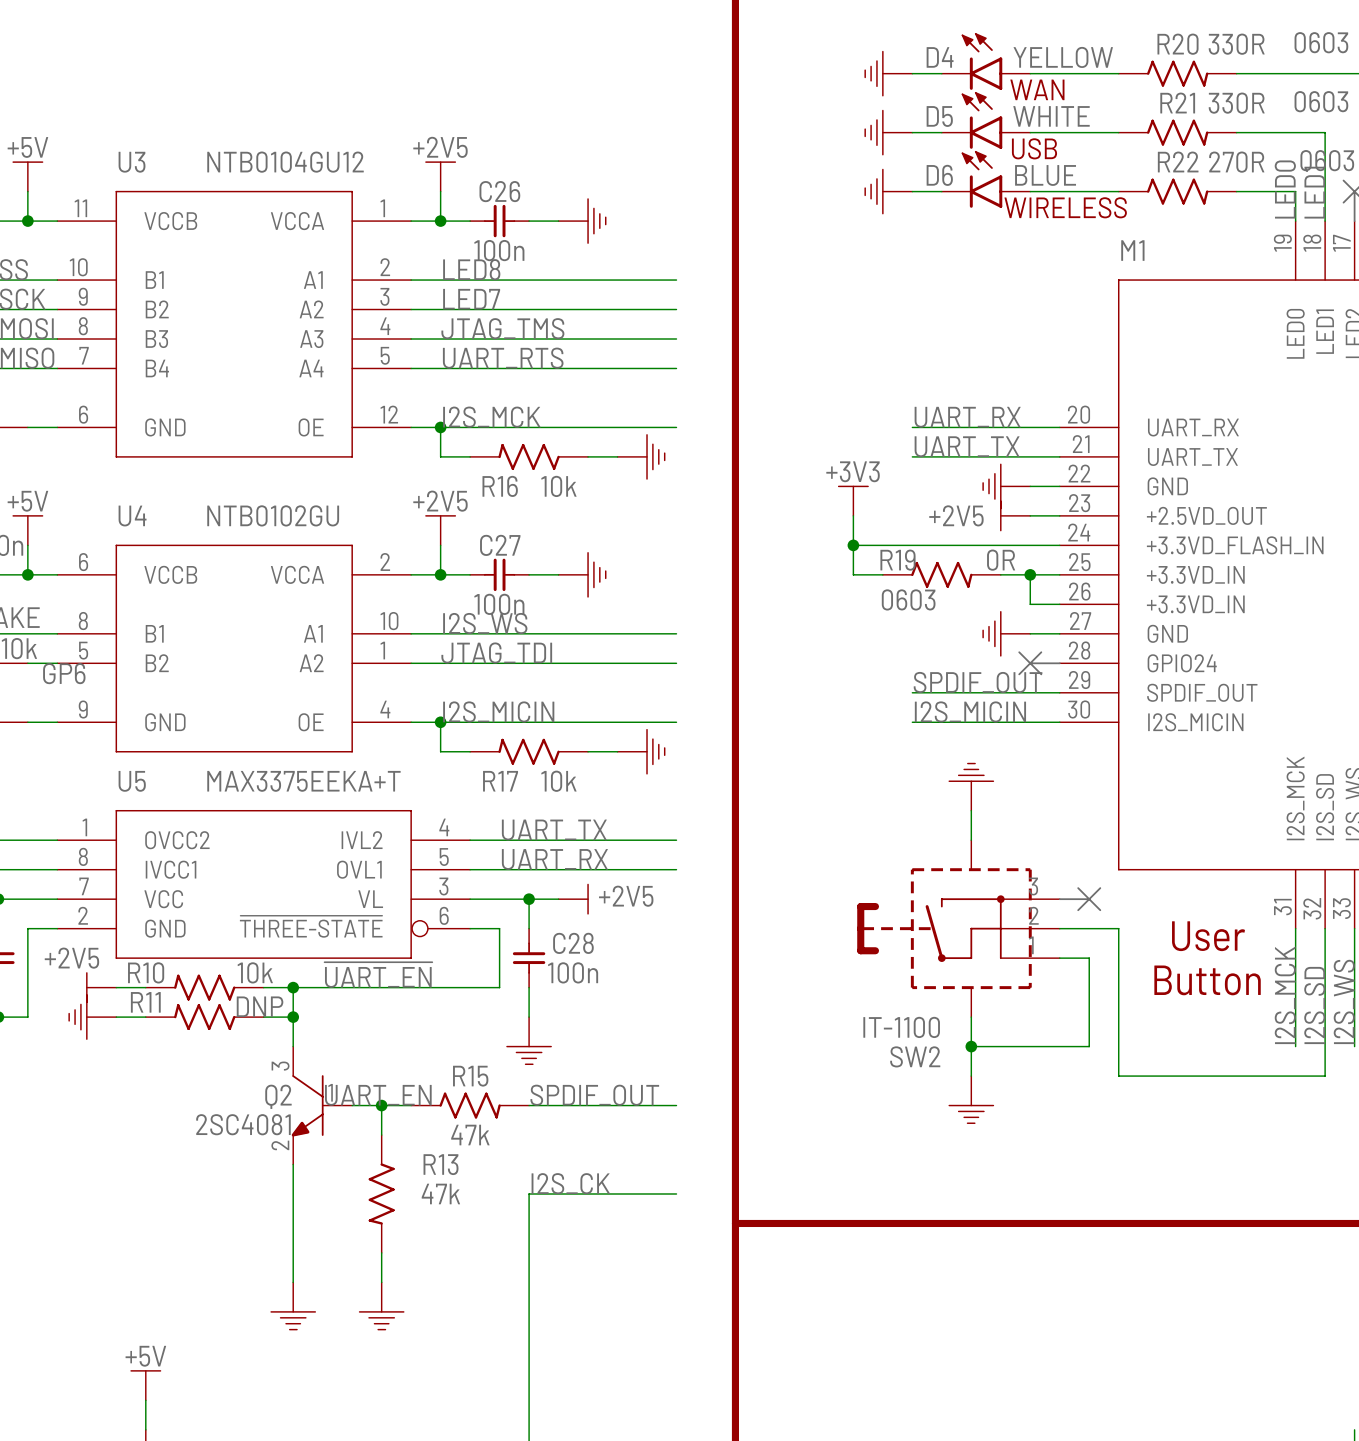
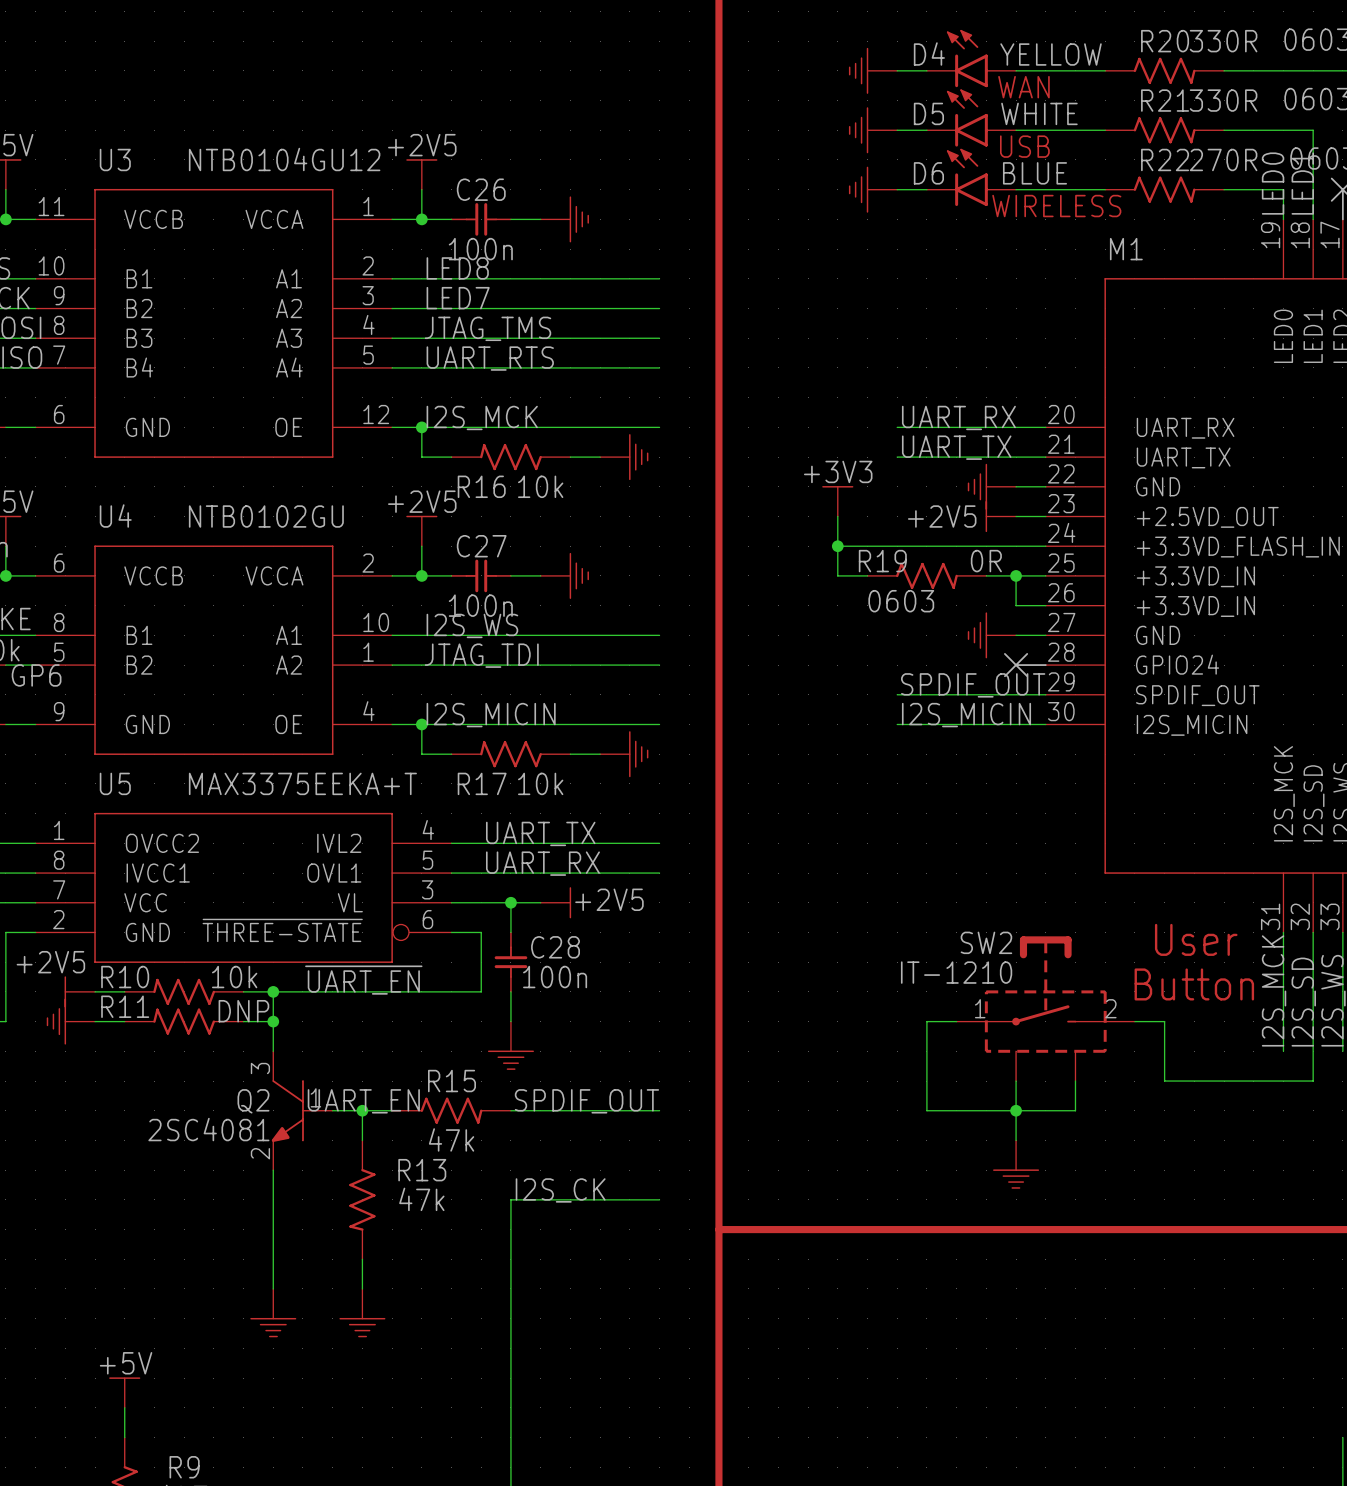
power symbol: (971, 786) -> none
wire: (971, 810) (971, 840) -> none
SW2 symbol: [857, 840, 1060, 1018] -> [956, 936, 1135, 1082]
part: (1080, 899) -> none
wire: (1059, 928) (1118, 928) (1118, 1076) (1177, 1076) -> (1134, 1021) (1164, 1021) (1164, 1081)
wire: (1059, 958) (1089, 958) (1089, 1046) (971, 1046) -> none
wire: (971, 1017) (971, 1076) -> (956, 1021) (926, 1021) (926, 1110) (1075, 1110) (1075, 1081)
SW2 value: IT-1100 (901, 1027) -> IT-1210 (956, 972)
junction: (971, 1046) -> none
SW2 name position: SW2 (915, 1056) -> SW2 (986, 942)
wire: none -> (1016, 1081) (1016, 1140)
power symbol position: (971, 1100) -> (1016, 1164)
junction: none -> (1016, 1110)

